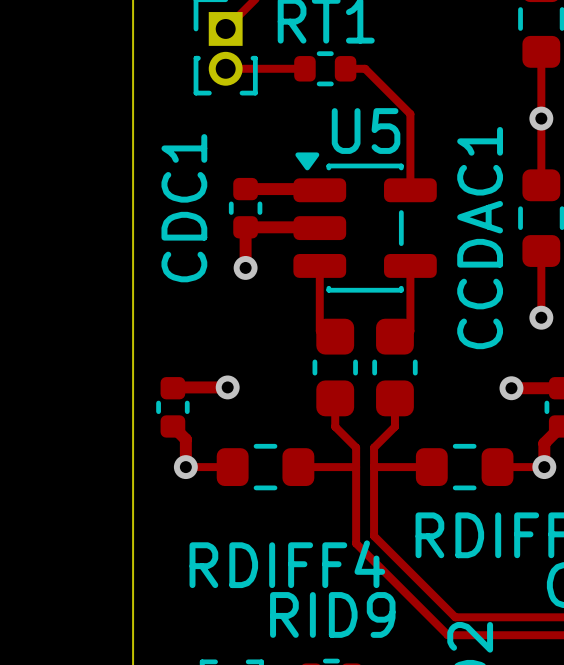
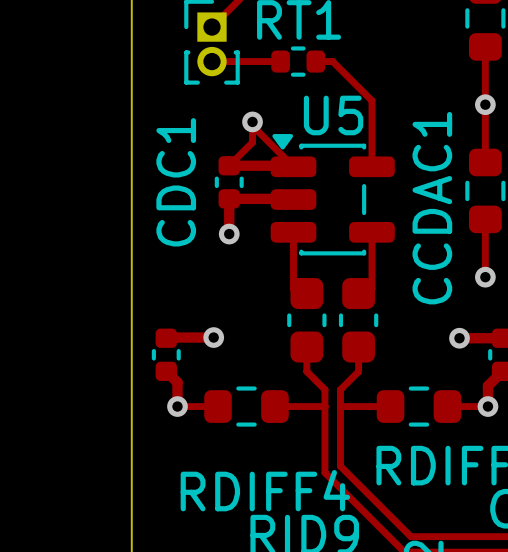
track: none -> (252, 121) (252, 142) (229, 165)
via: none -> (252, 121)
track: none -> (252, 125) (292, 165)

